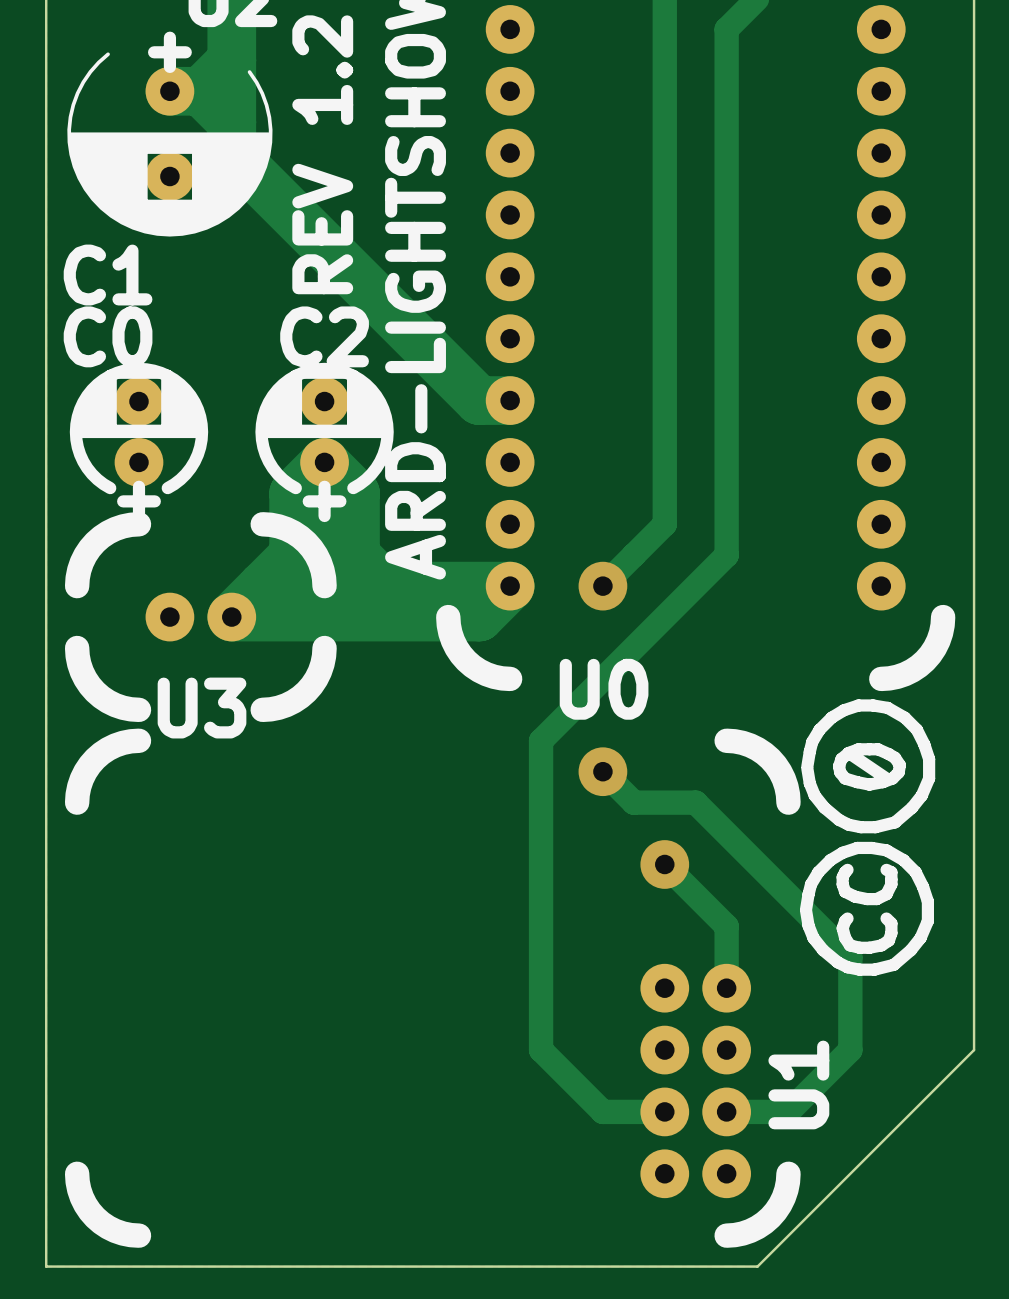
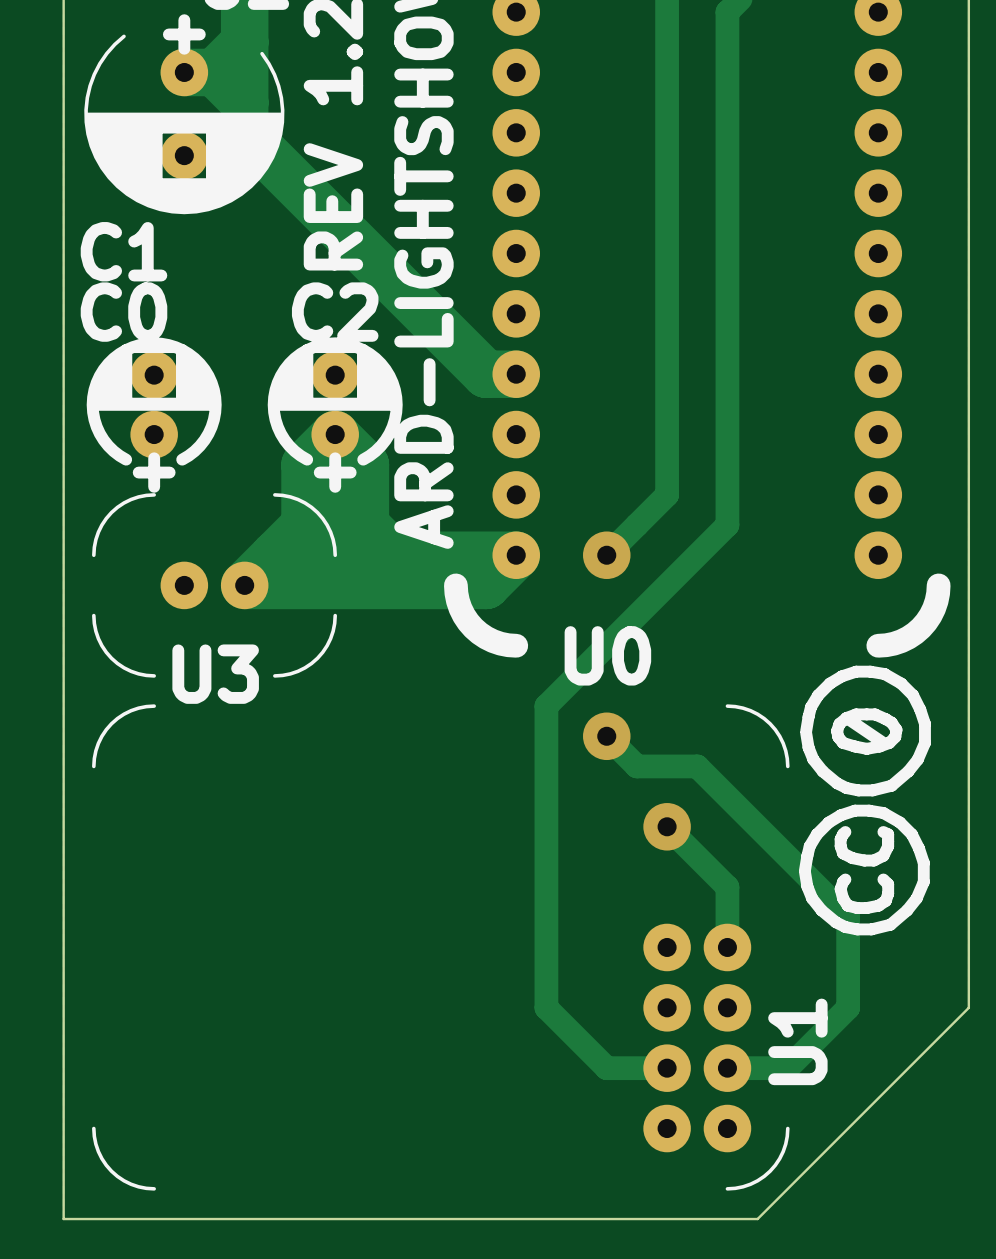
U3 footprint: [64, 512, 337, 723] -> [92, 493, 337, 678]
U1 footprint: [64, 728, 801, 1248] -> [92, 704, 790, 1191]

